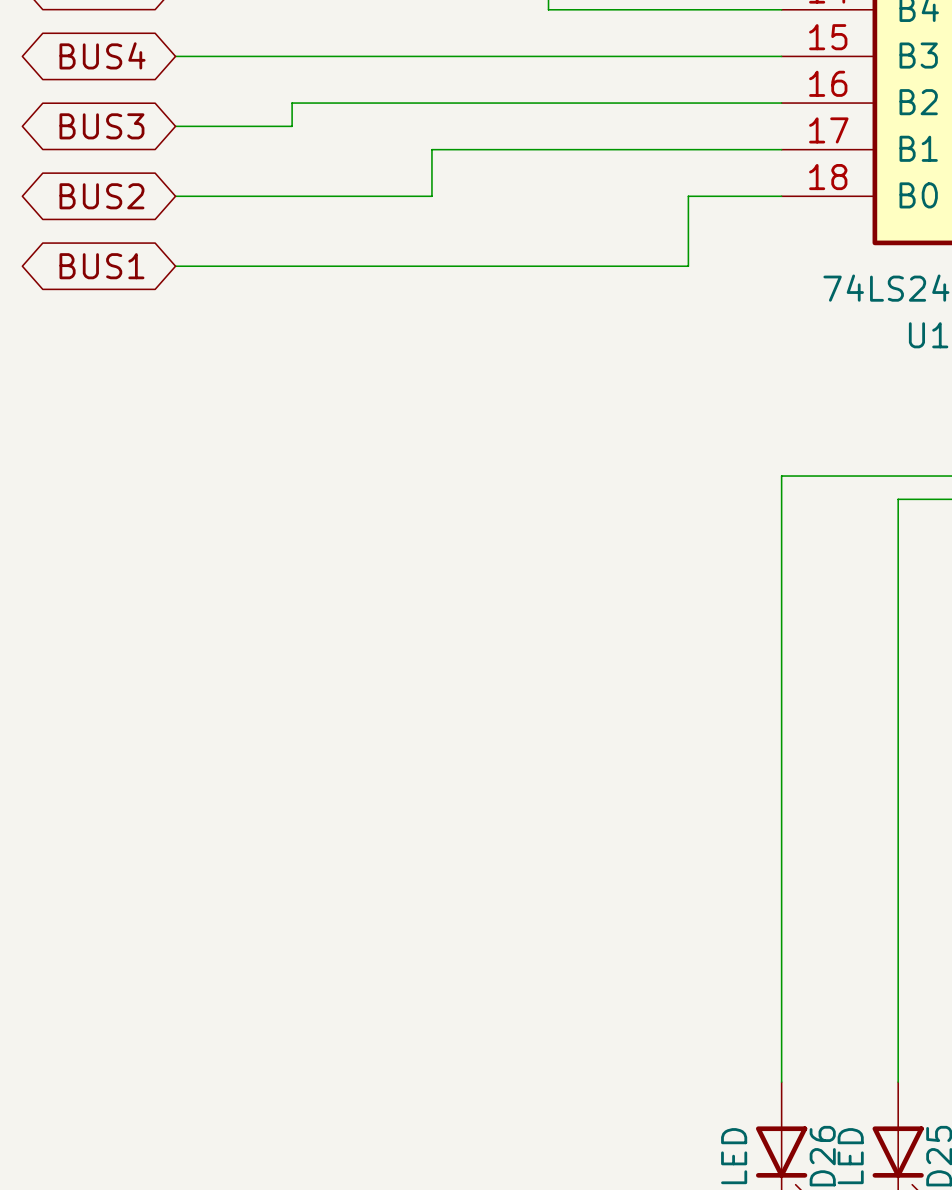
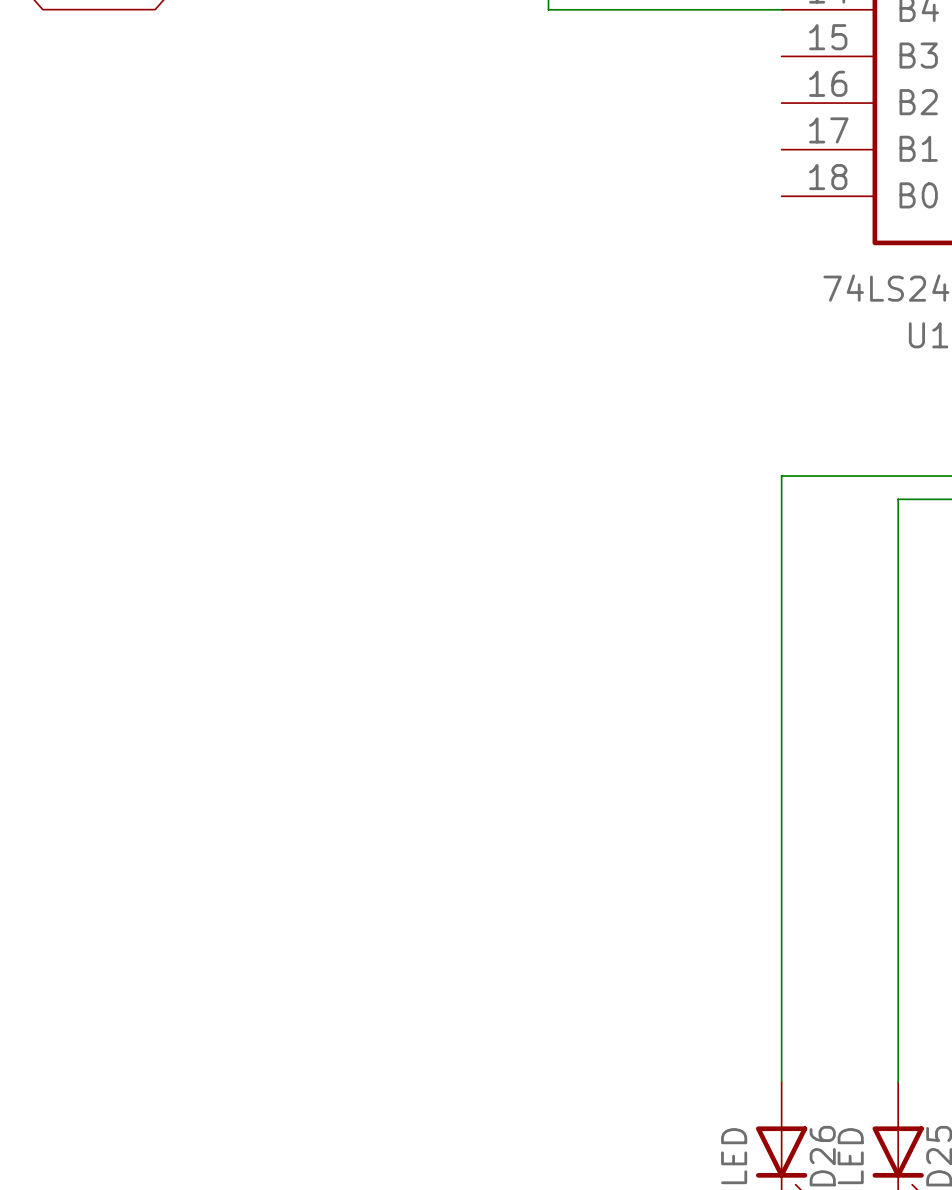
global label: BUS4 (102, 55) -> none
wire: (175, 56) (781, 56) -> none
wire: (781, 103) (292, 103) (292, 126) (175, 126) -> none
global label: BUS3 (101, 126) -> none
wire: (781, 149) (431, 149) (431, 196) (175, 196) -> none
global label: BUS2 (101, 196) -> none
wire: (781, 196) (688, 196) (688, 266) (175, 266) -> none
global label: BUS1 (101, 266) -> none

